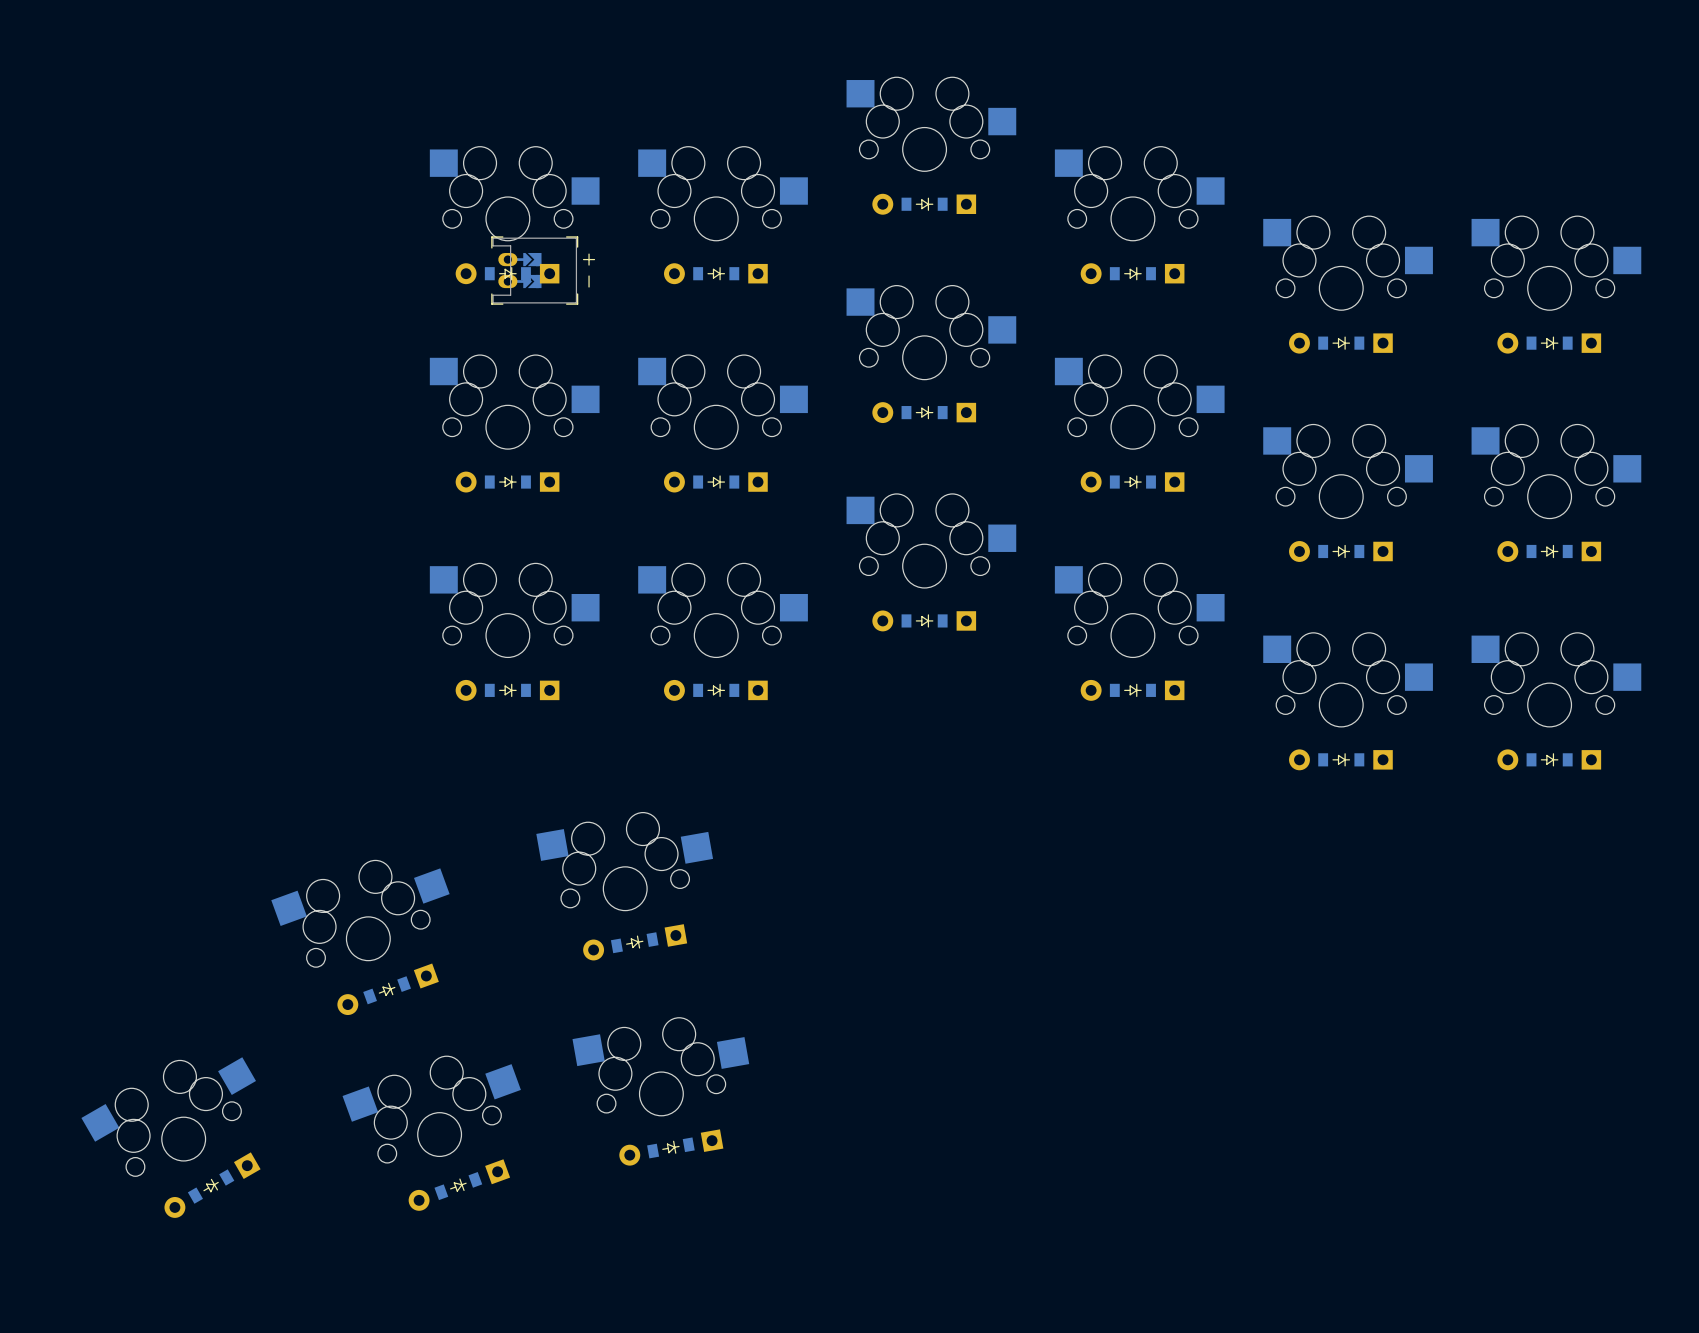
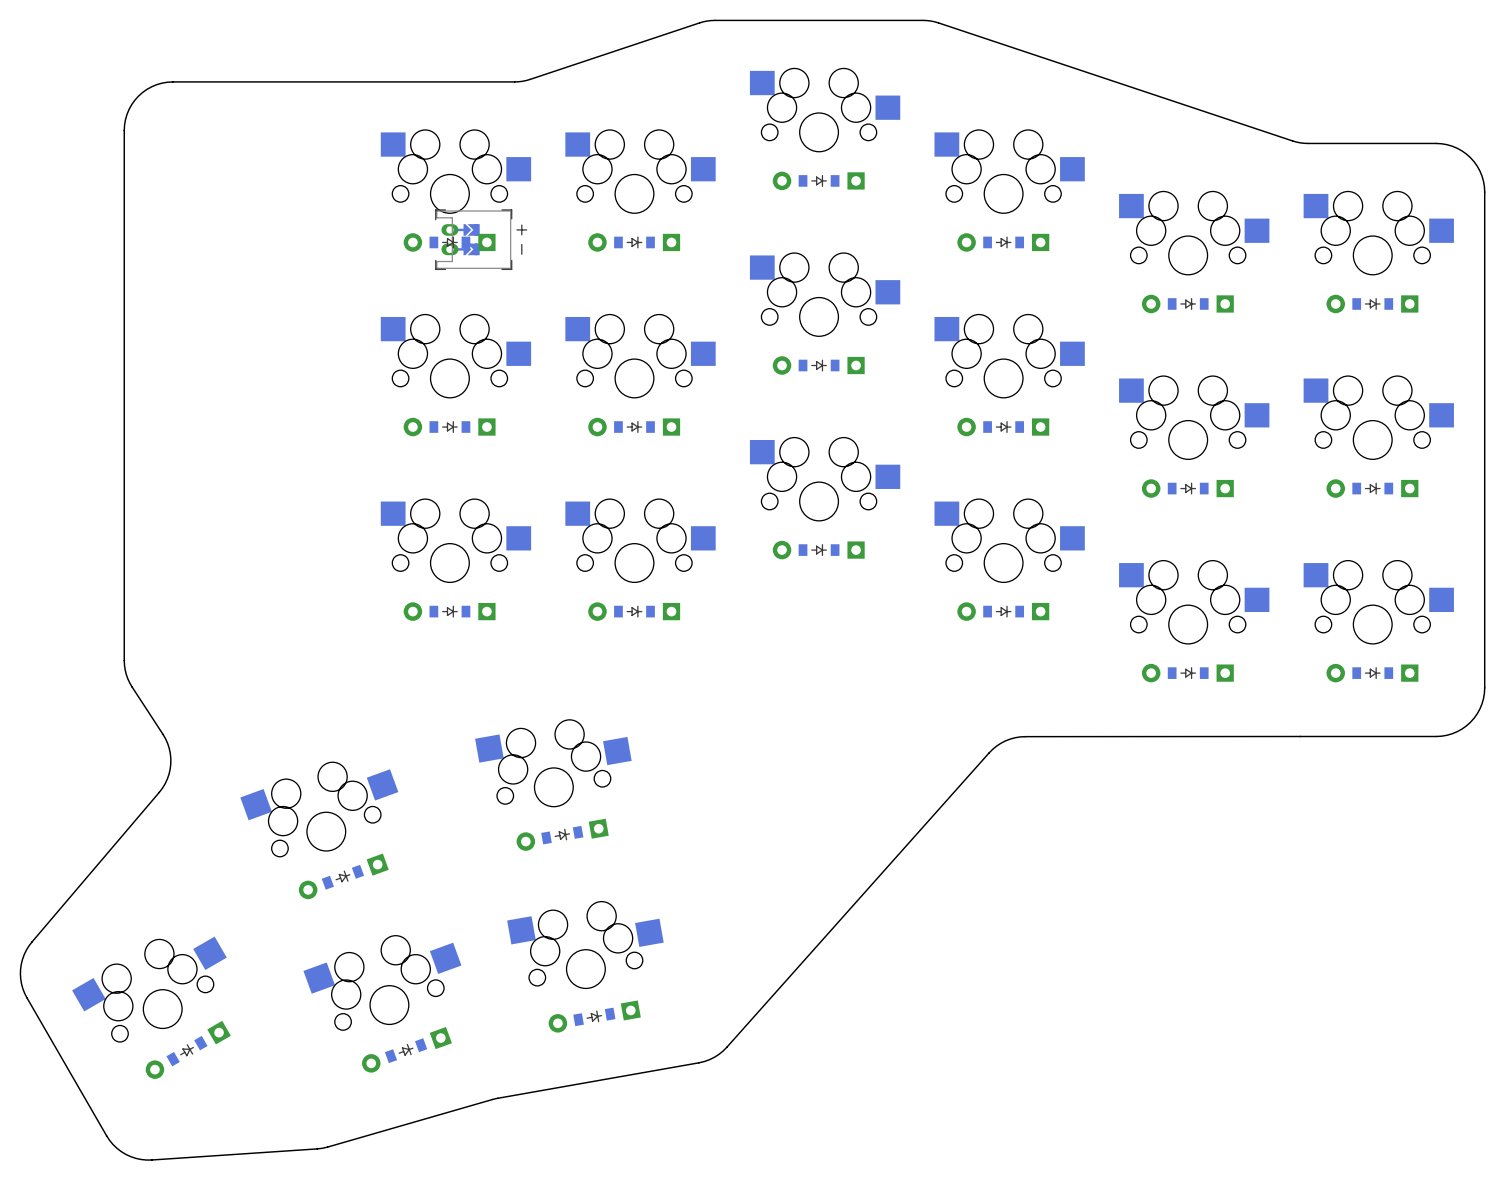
board edge: none -> (923, 20) (711, 20) (522, 81) (167, 82) (146, 89) (131, 104) (125, 119) (124, 130) (124, 665) (129, 683) (167, 743) (170, 758) (170, 769) (167, 779) (159, 792) (28, 945) (22, 959) (20, 974) (22, 988) (26, 997) (106, 1135) (121, 1151) (135, 1158) (151, 1159) (322, 1148) (495, 1098) (709, 1059) (726, 1047) (989, 752) (996, 746) (1010, 739) (1025, 736) (1436, 736) (1452, 733) (1461, 729) (1477, 713) (1483, 698) (1484, 687) (1484, 192) (1481, 175) (1474, 161) (1457, 148) (1441, 143) (1296, 142) (938, 22) (923, 20)

